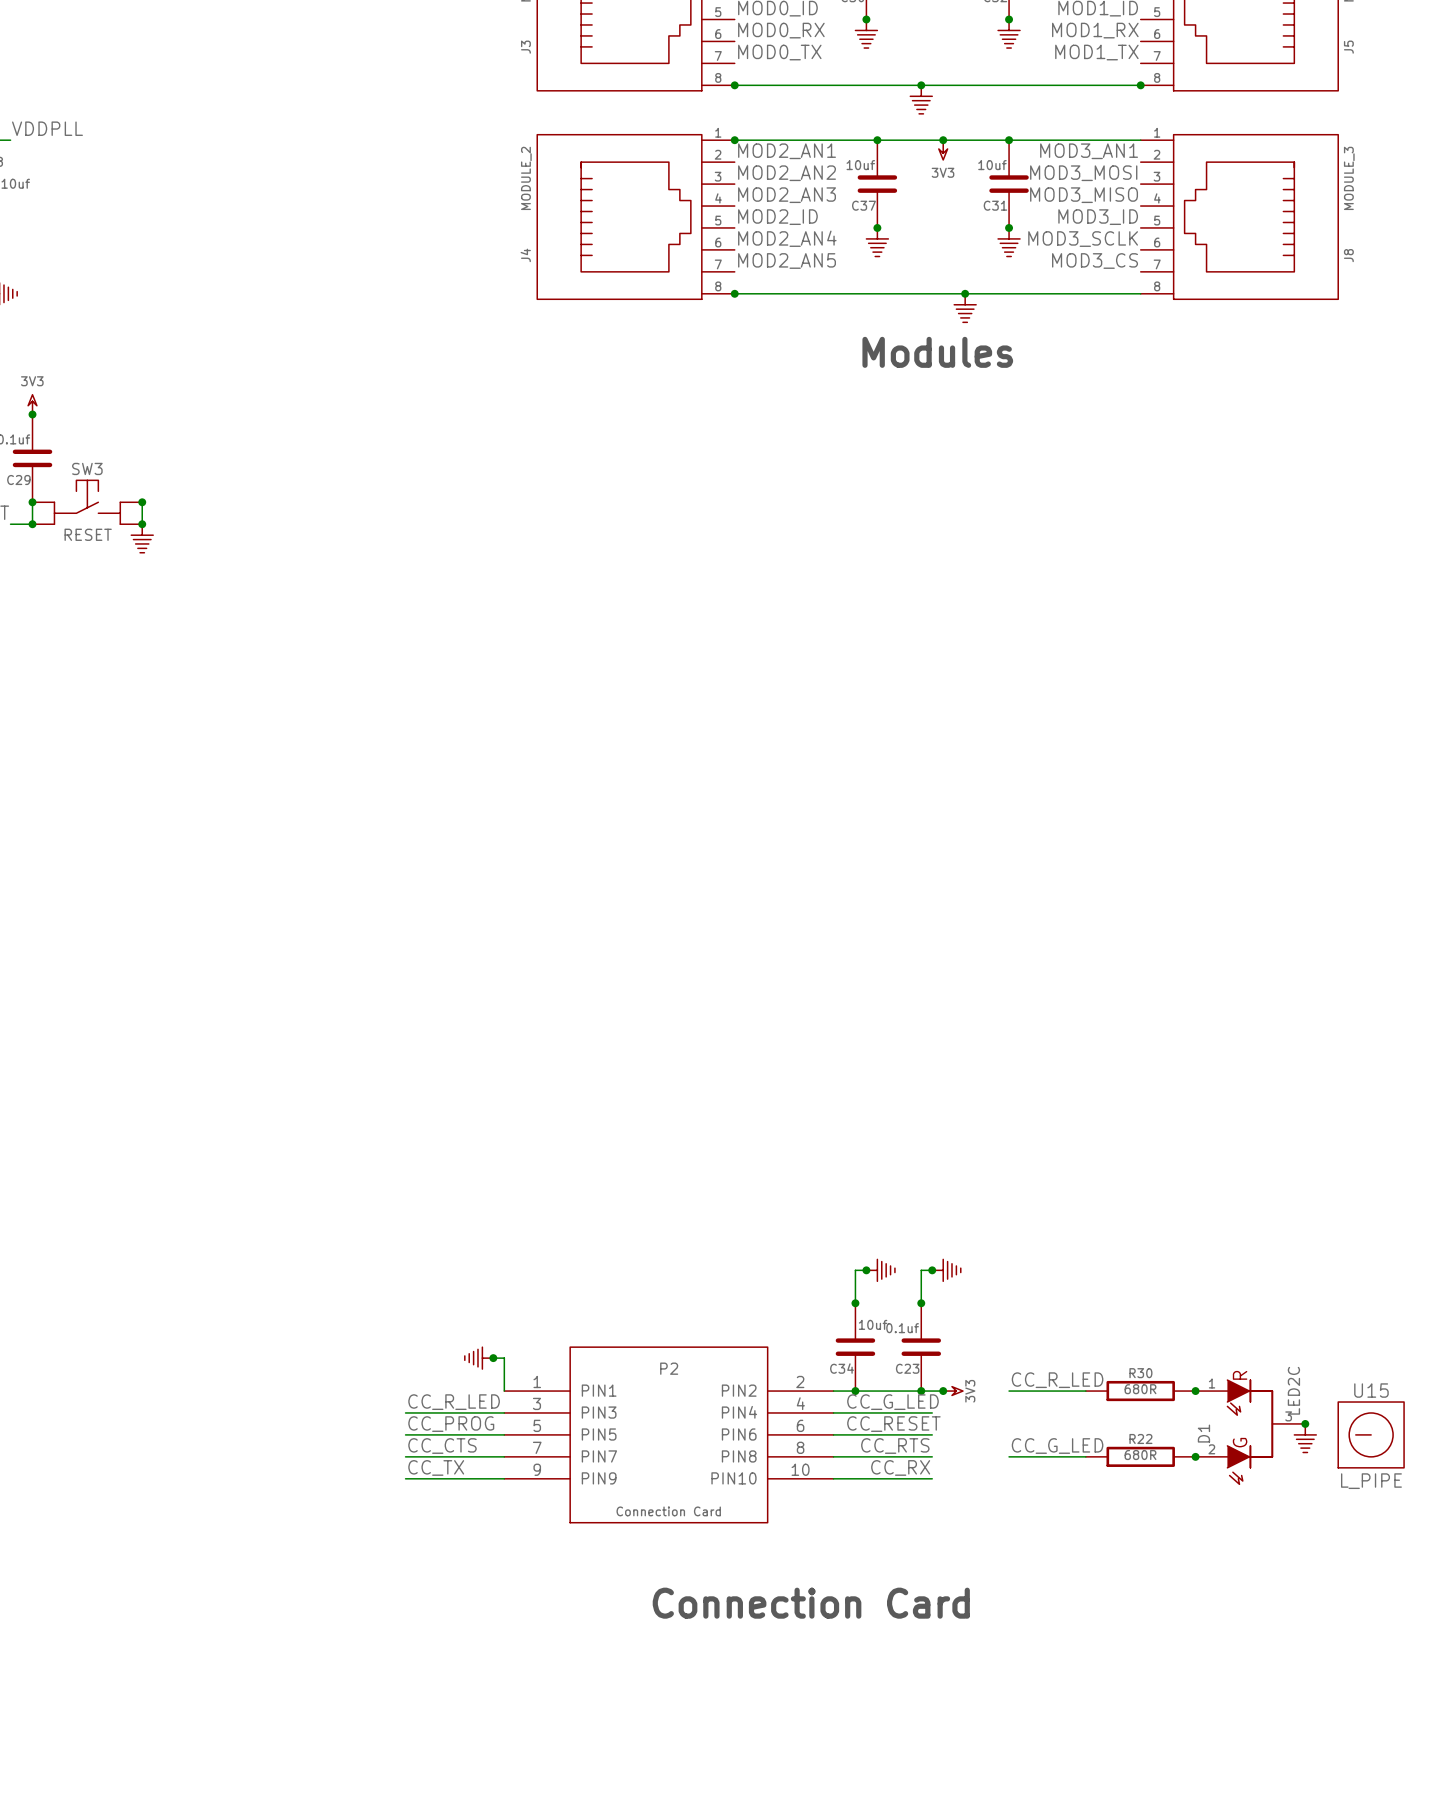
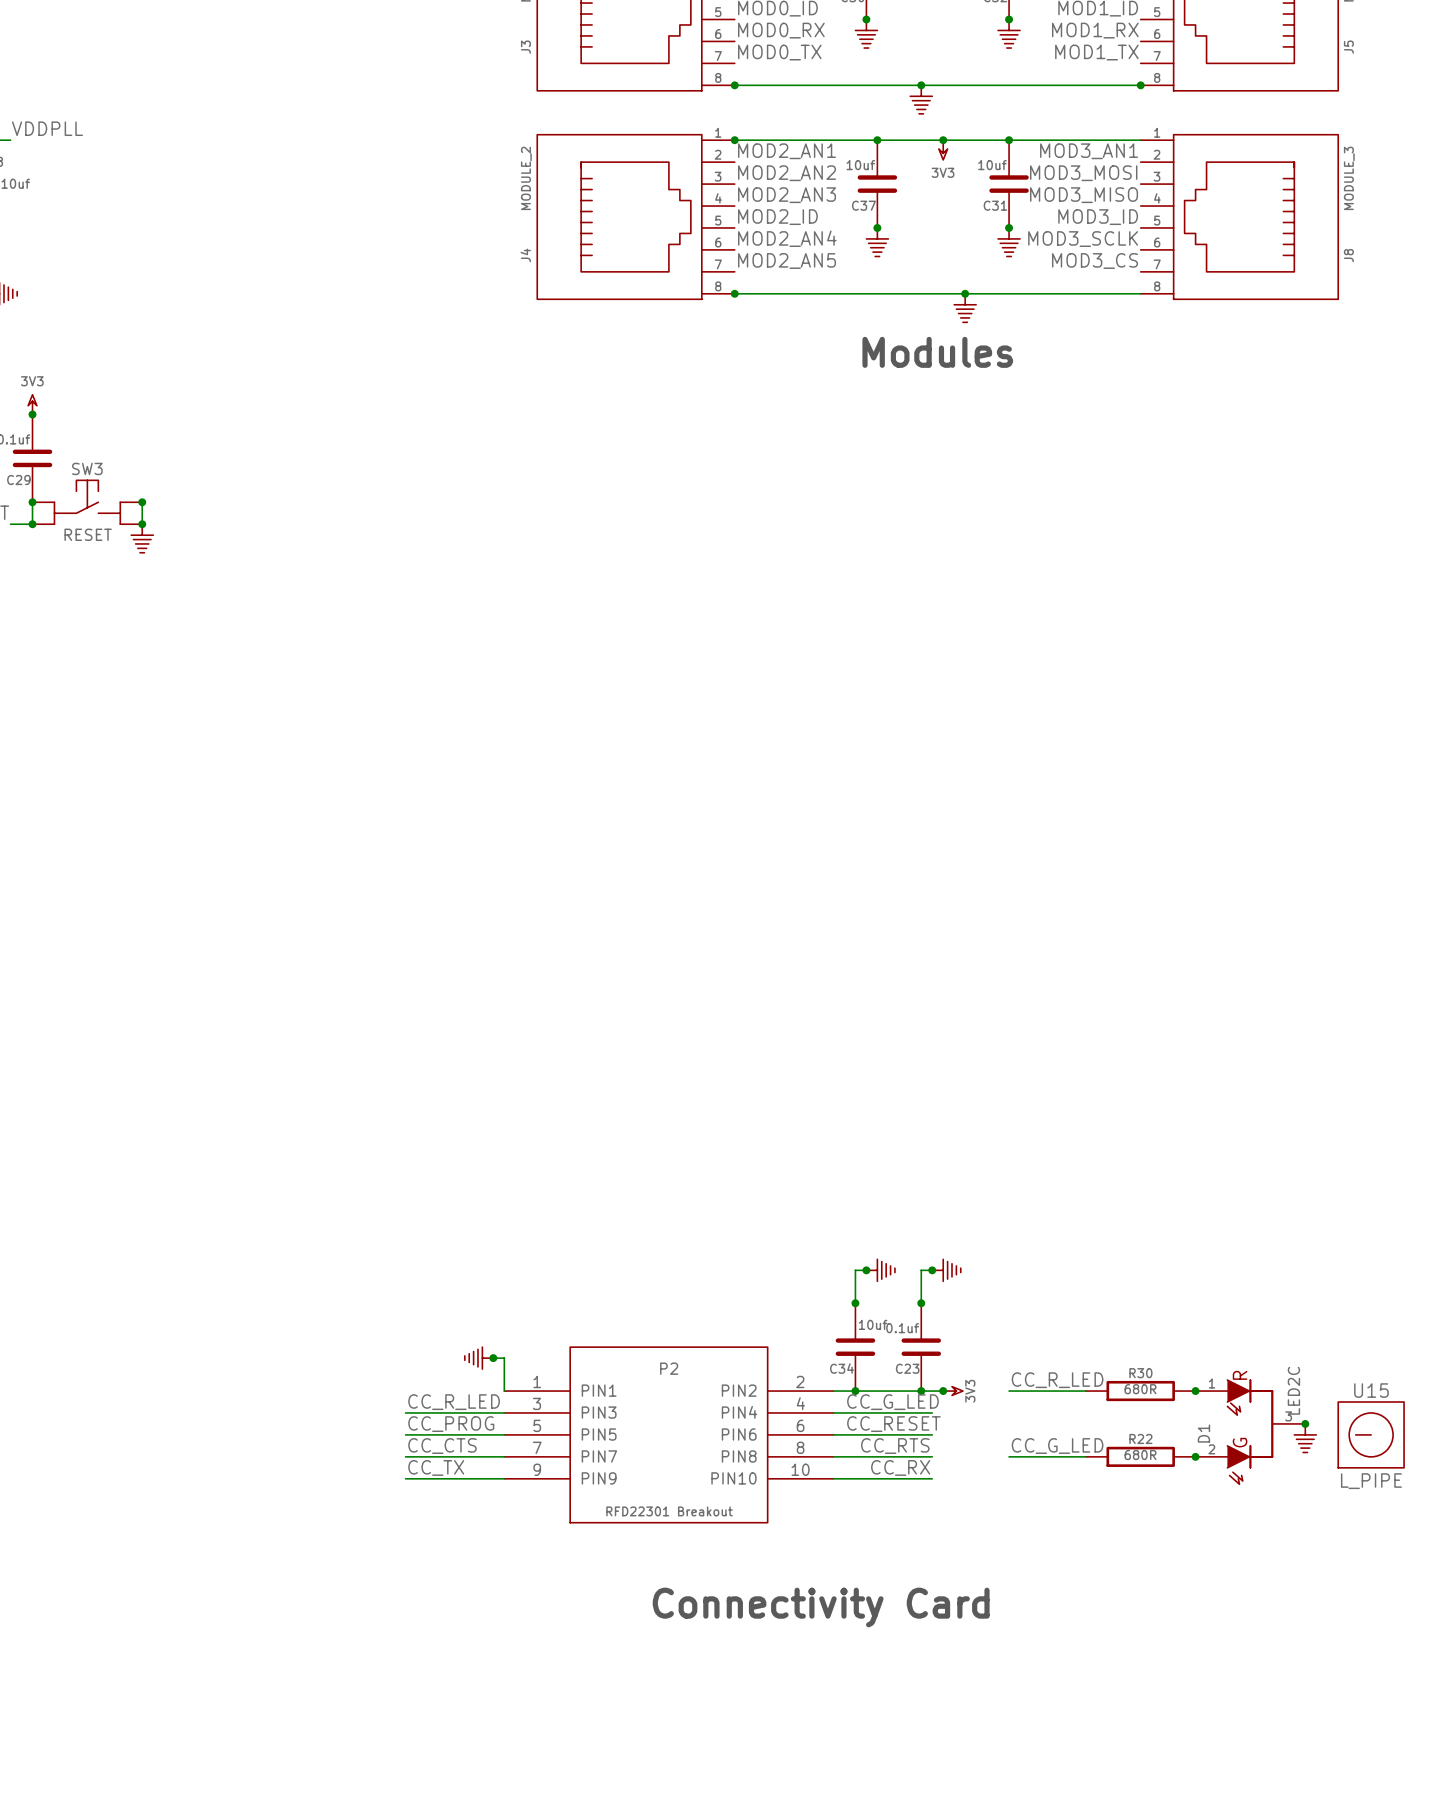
P2 value: Connection Card (668, 1511) -> RFD22301 Breakout (669, 1511)
text: Connection Card (811, 1603) -> Connectivity Card (821, 1607)

